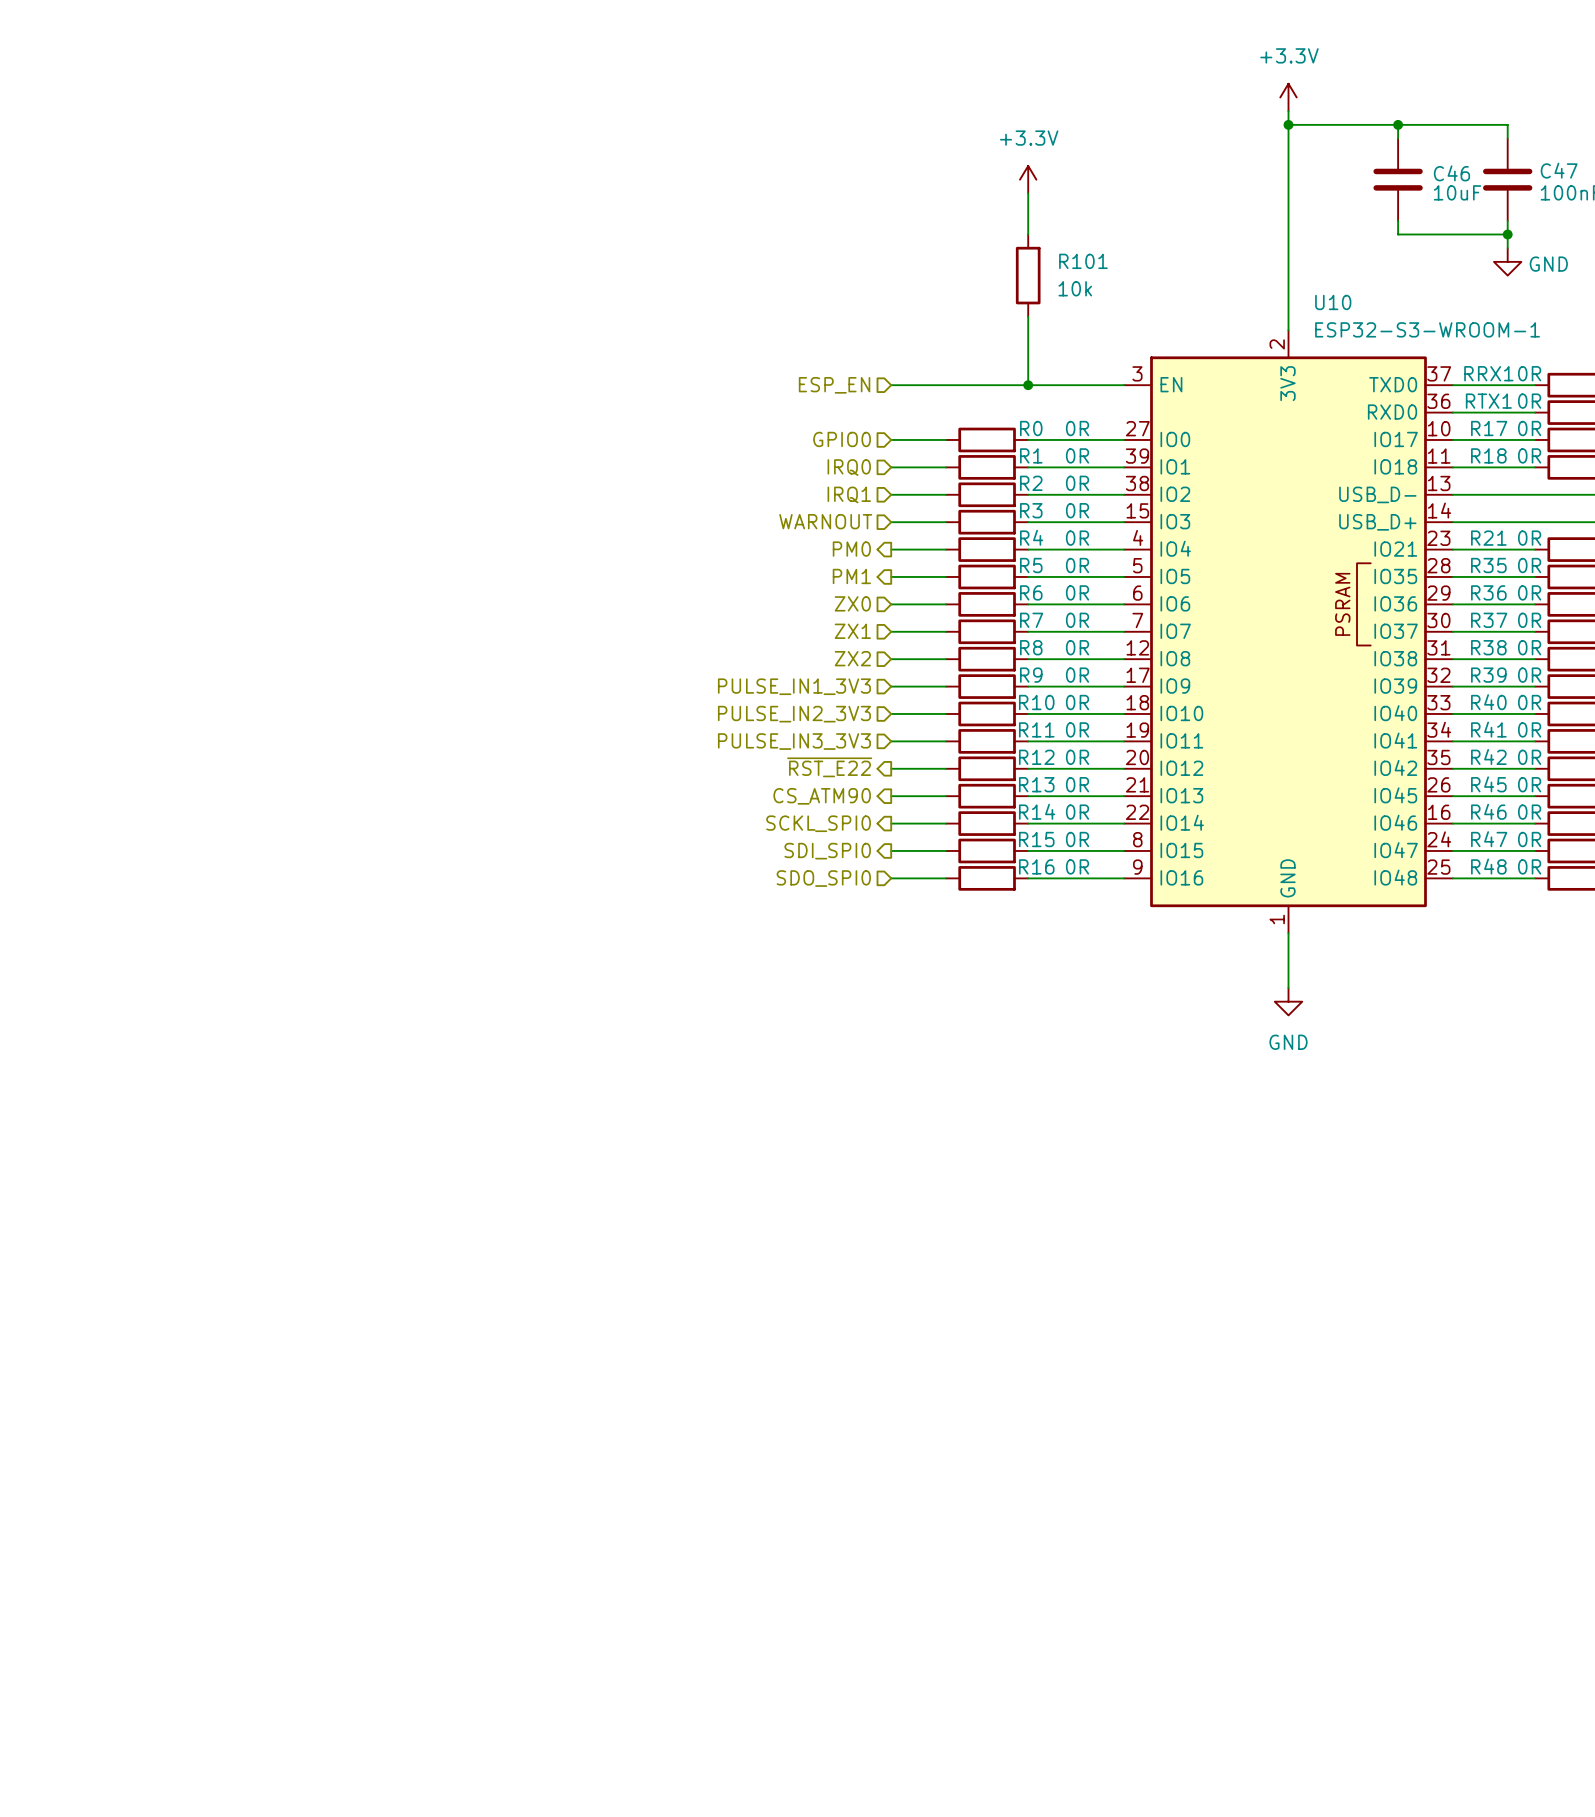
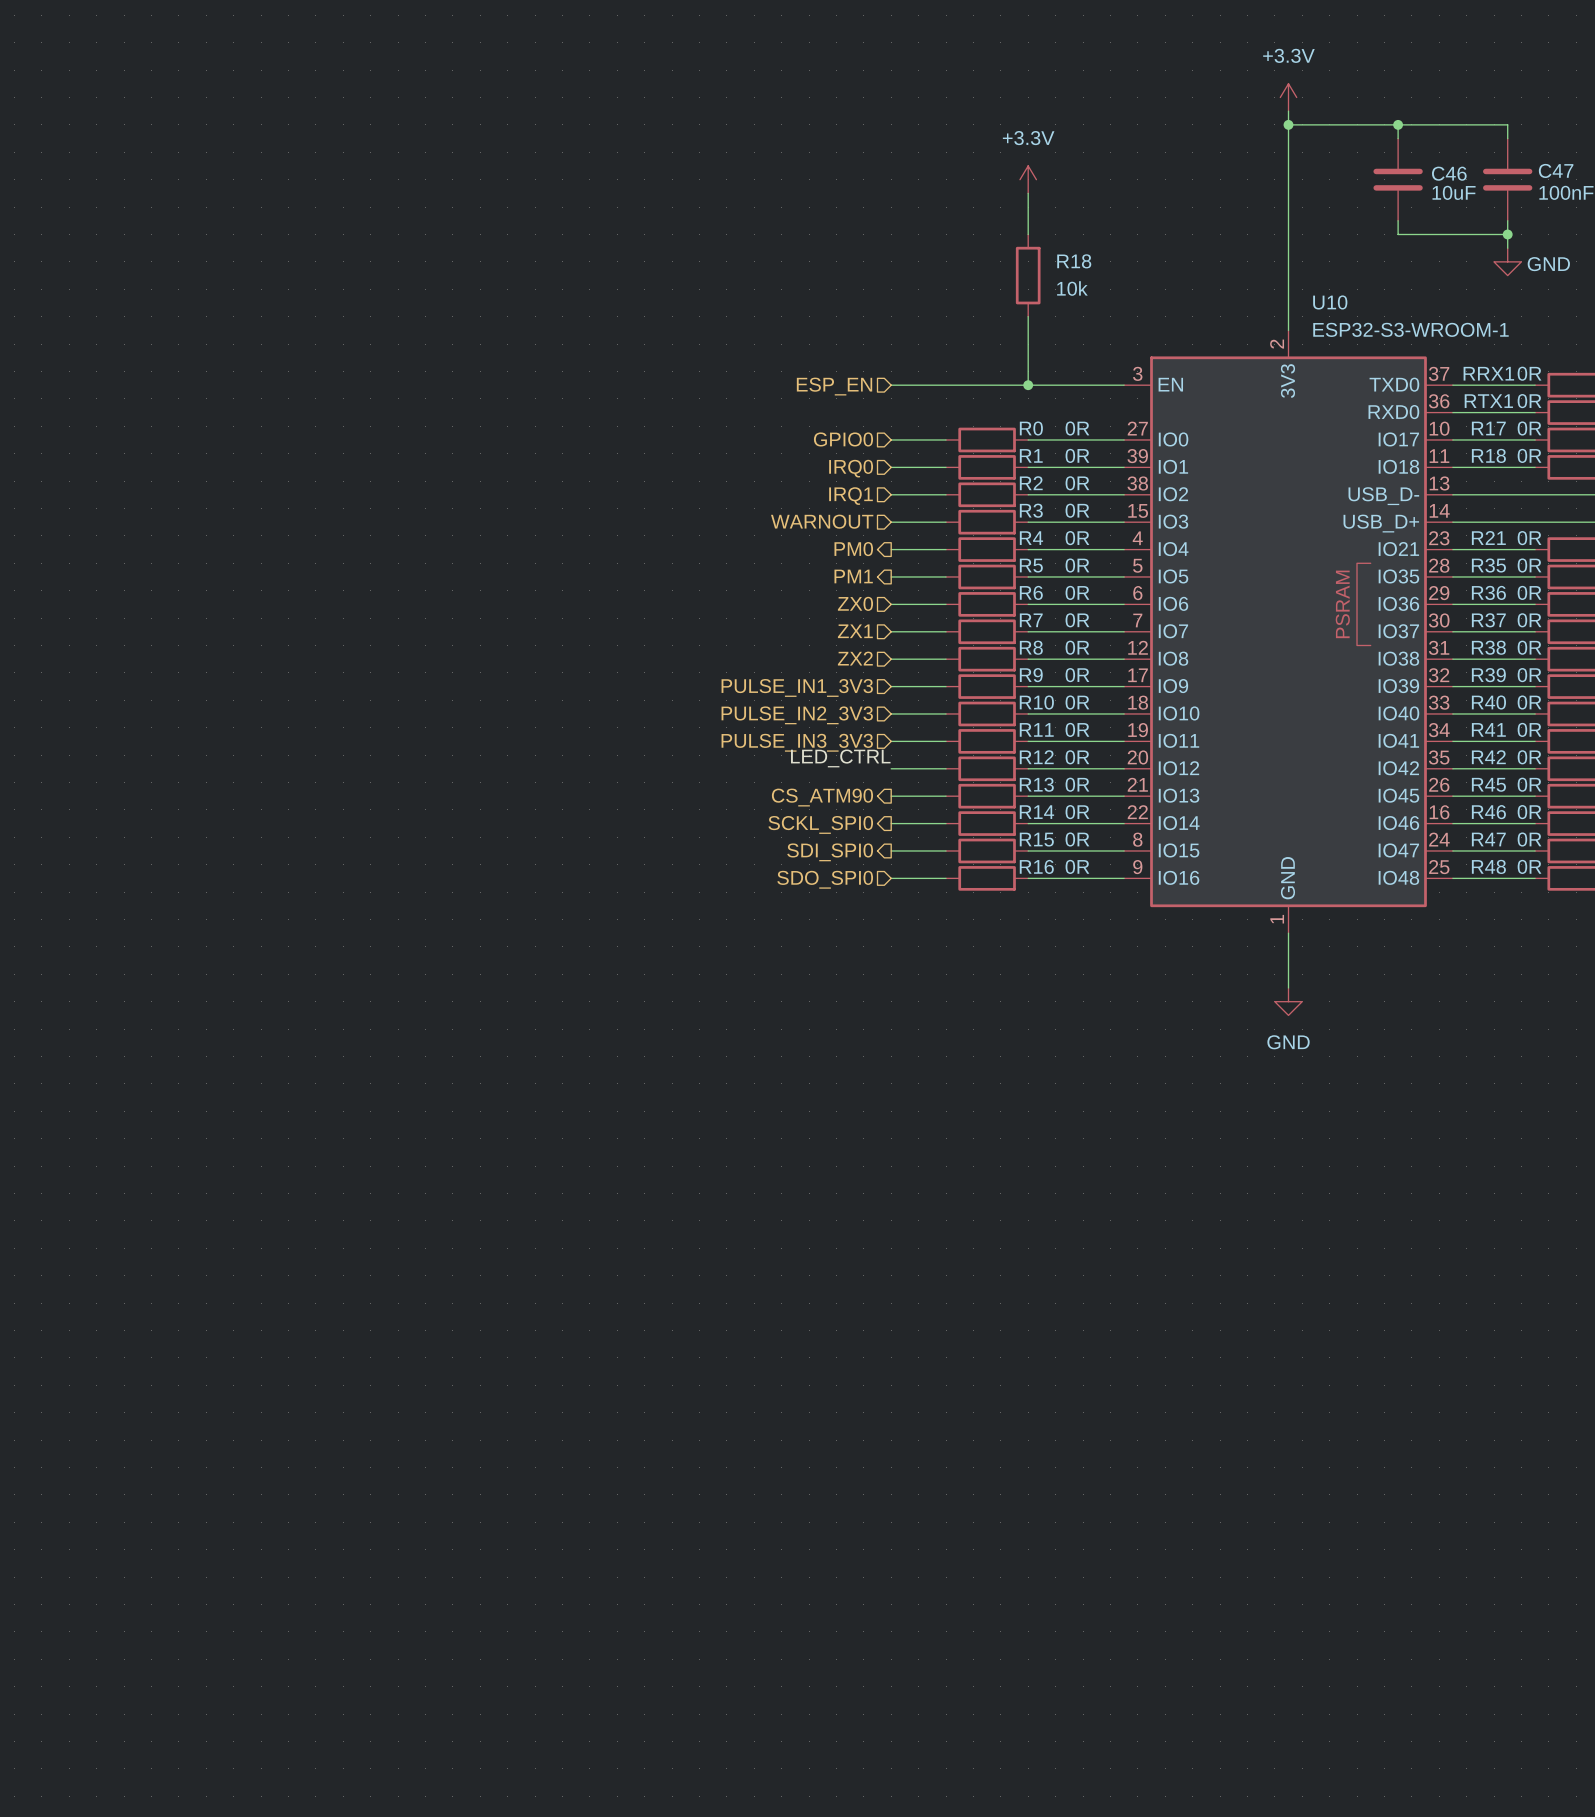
R101 name: R101 (1083, 261) -> R18 (1074, 261)
label: none -> LED_CTRL (840, 758)
hierarchical label: ~{RST_E22} (829, 767) -> none

